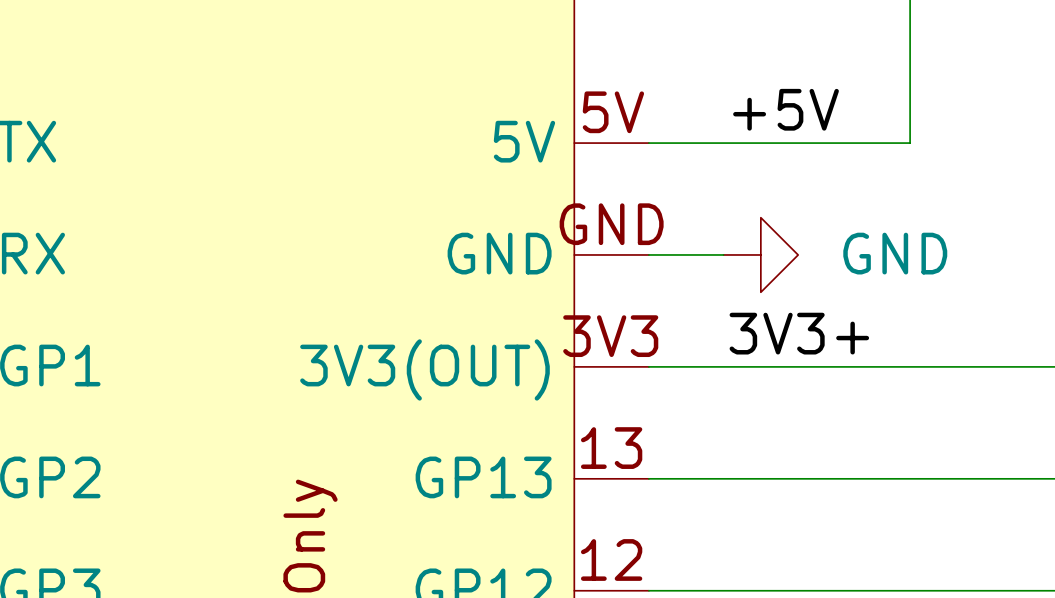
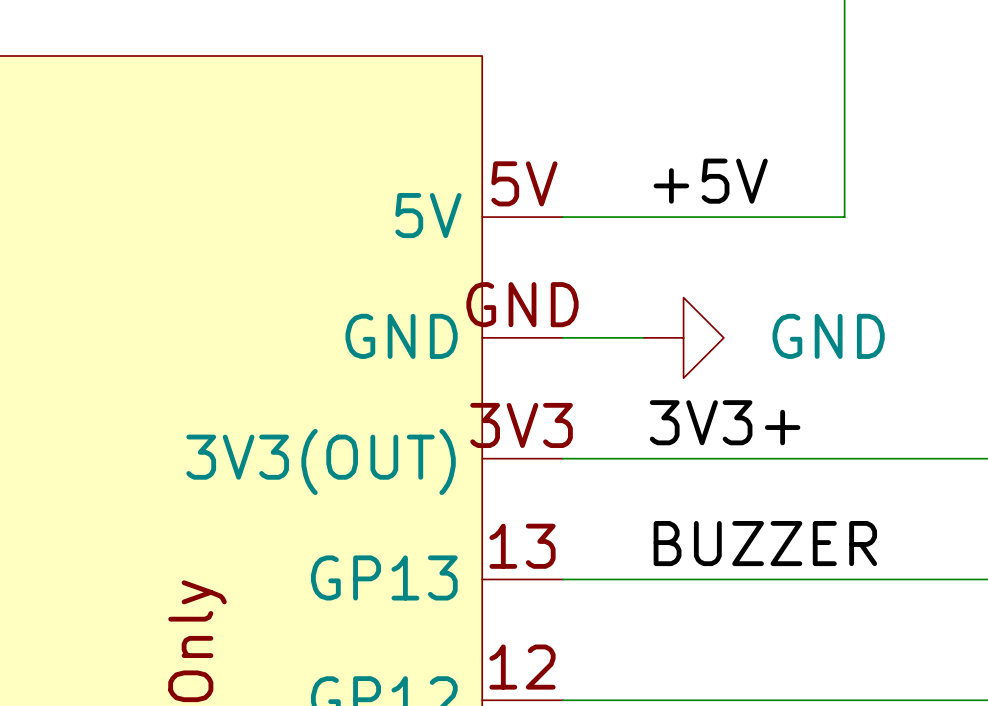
label: none -> BUZZER (765, 543)

